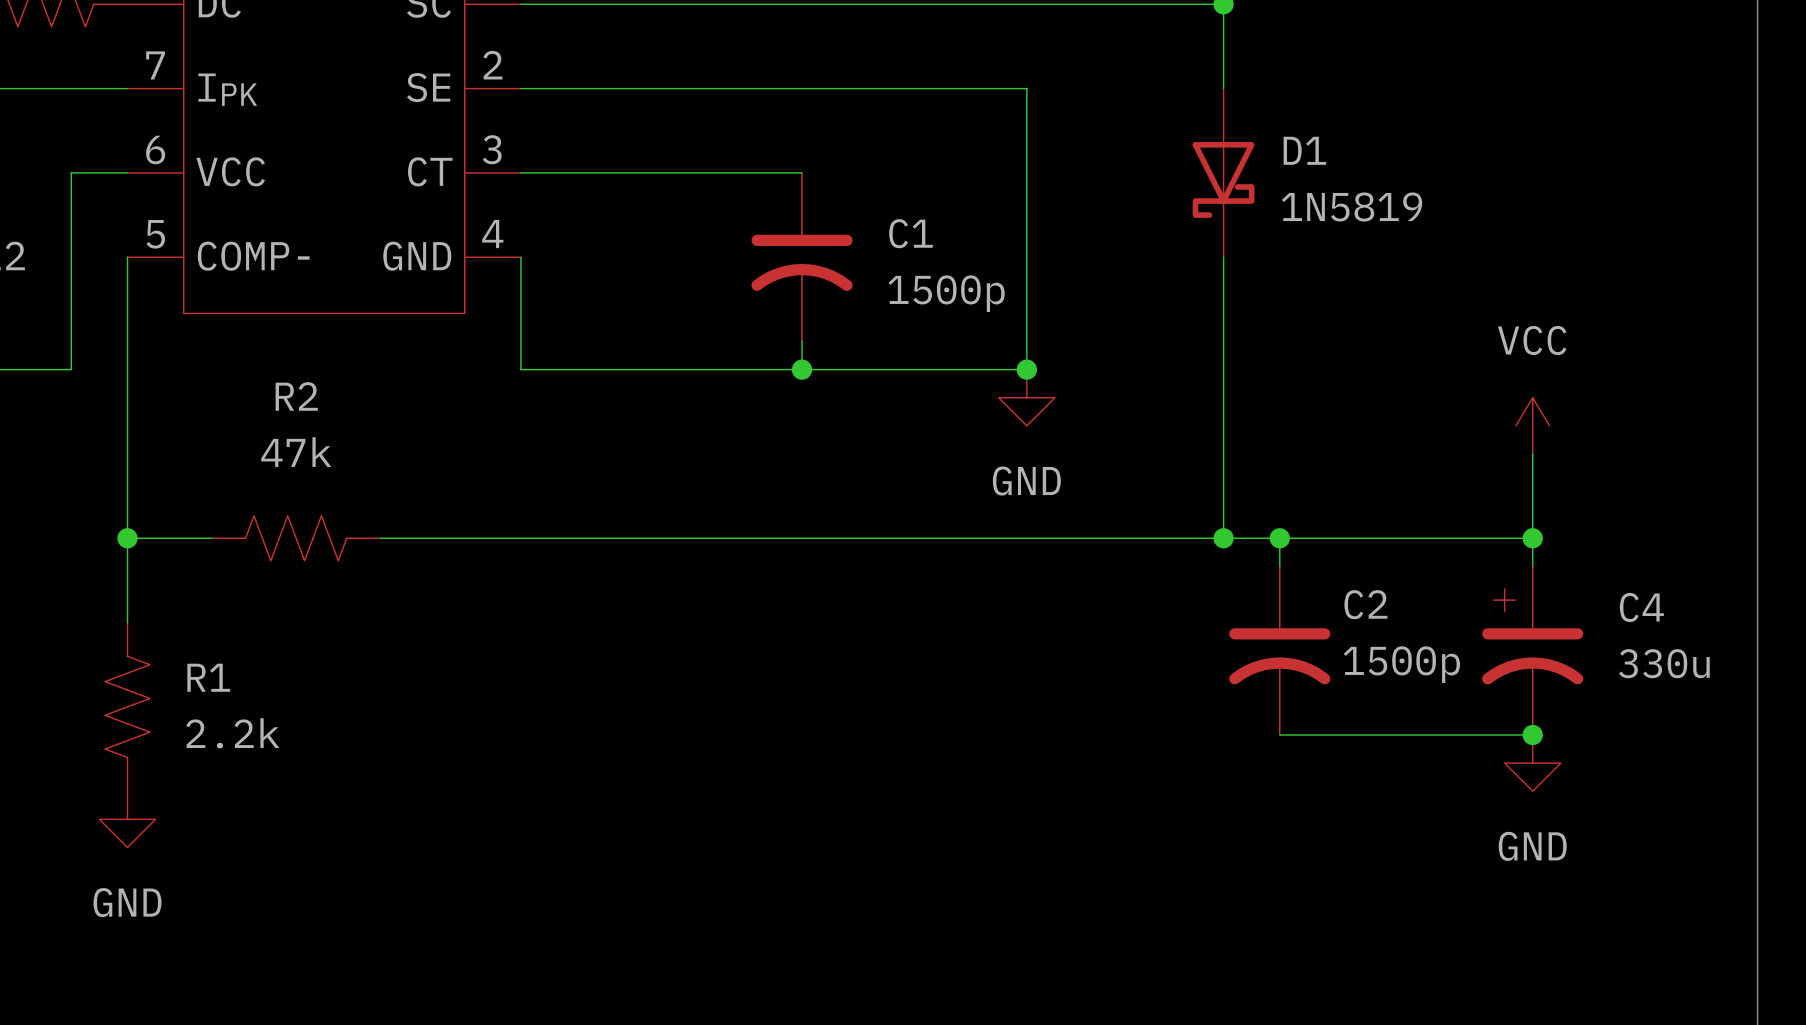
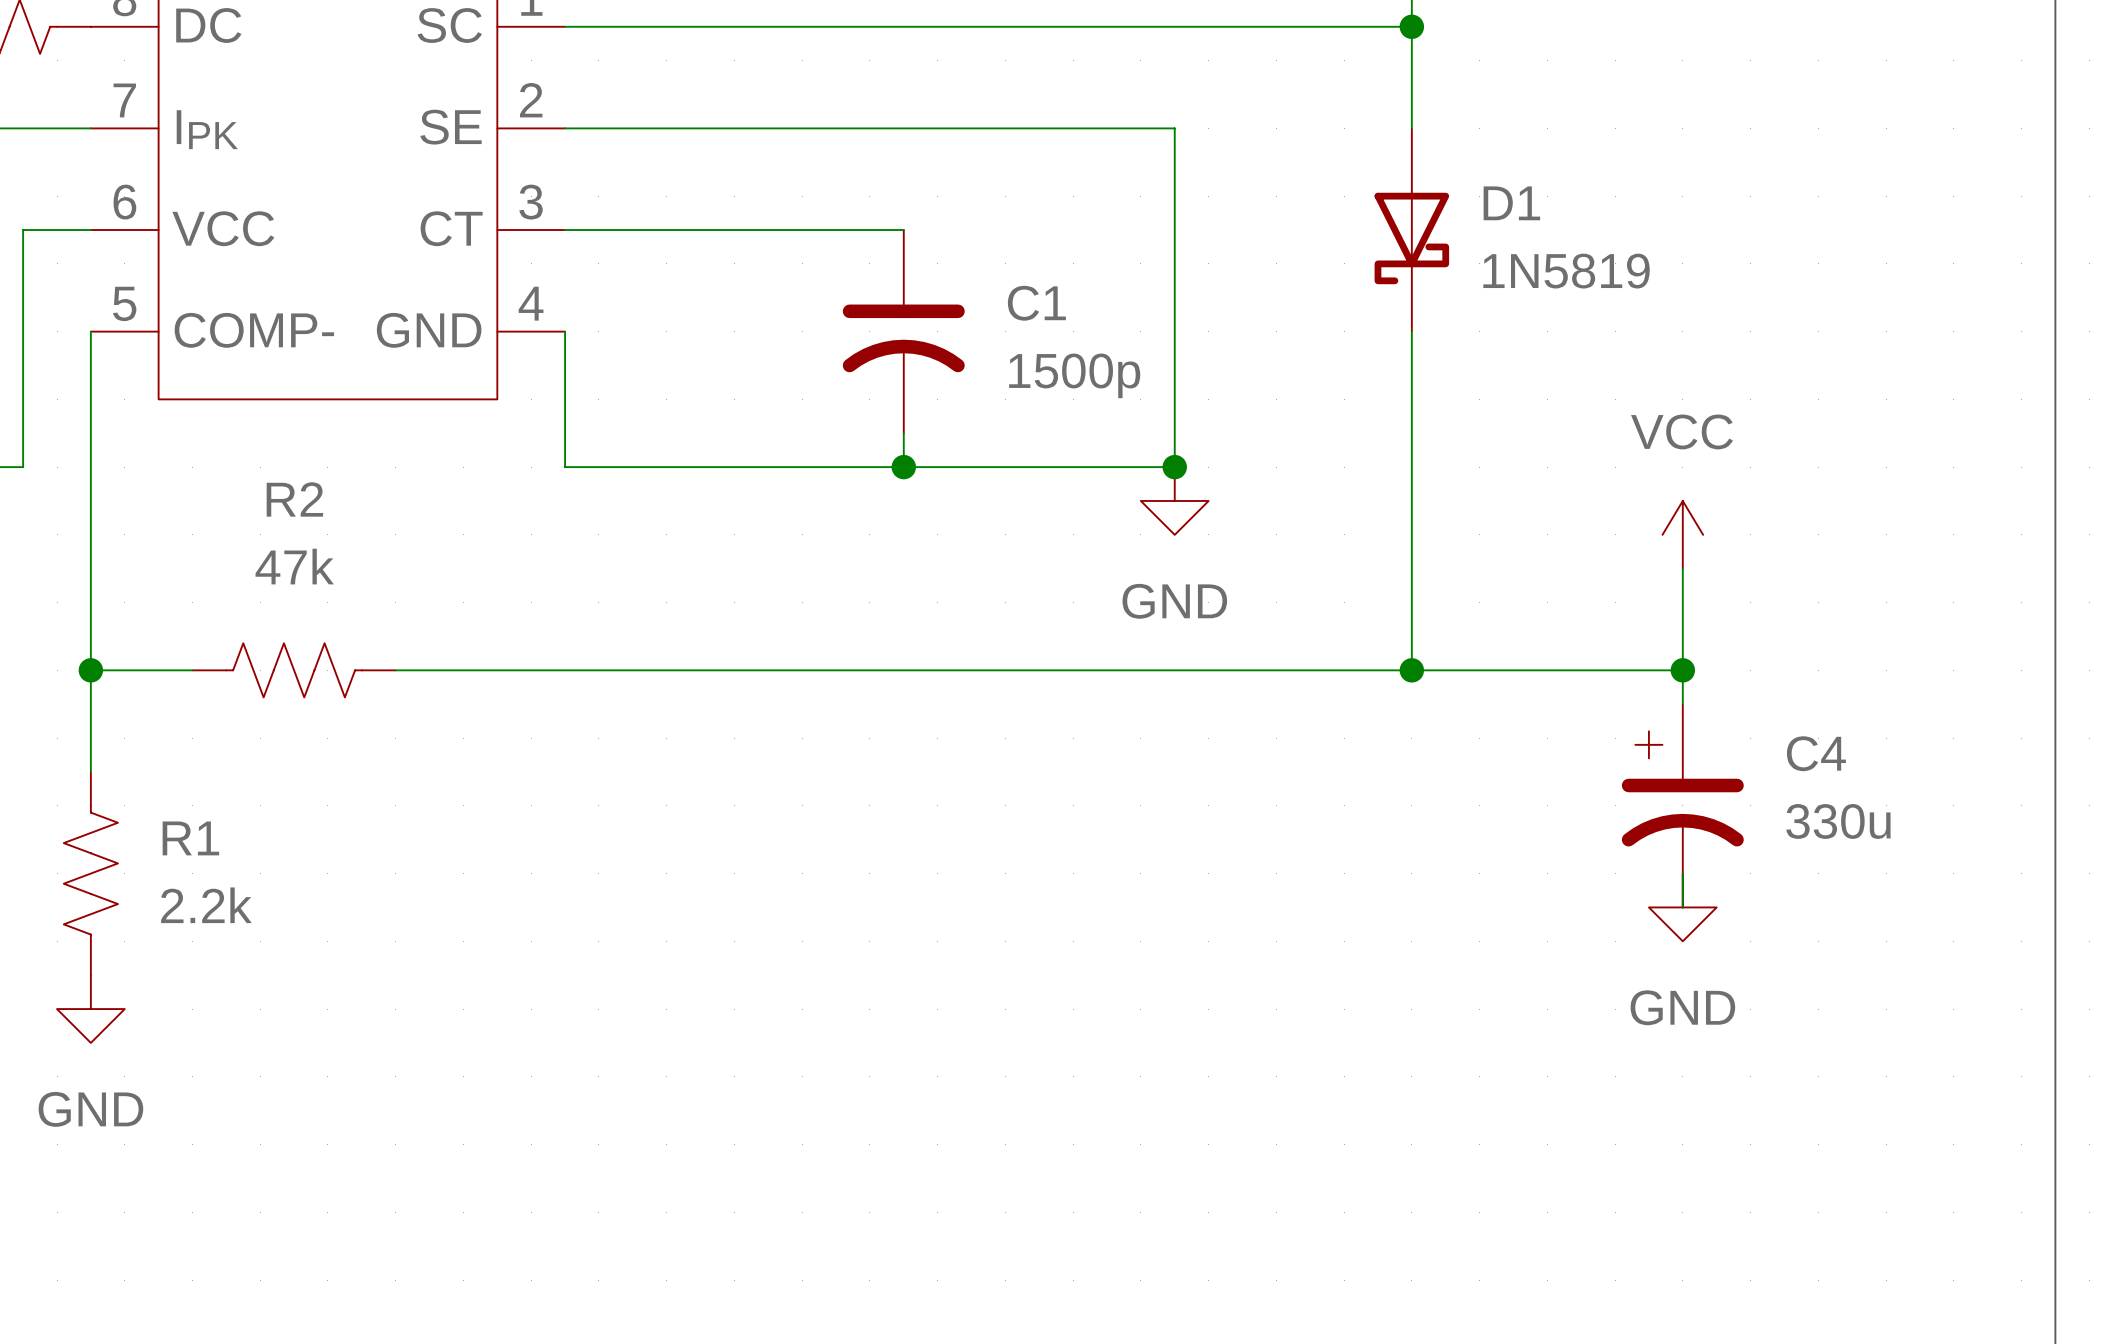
power symbol position: VCC (1532, 425) -> VCC (1682, 534)
wire: (1532, 453) (1532, 566) -> (1682, 568) (1682, 704)
wire: (1279, 538) (1279, 566) -> (1682, 873) (1682, 907)
junction: (1279, 538) -> none
wire: (1448, 538) (1532, 538) -> none
junction: none -> (1682, 670)
junction: (1532, 538) -> none
C2: 1500p (1279, 650) -> none
C4 position: (1532, 650) -> (1682, 805)
wire: (1279, 735) (1532, 735) -> none
junction: (1532, 735) -> none
power symbol position: GND (1532, 763) -> GND (1682, 907)

